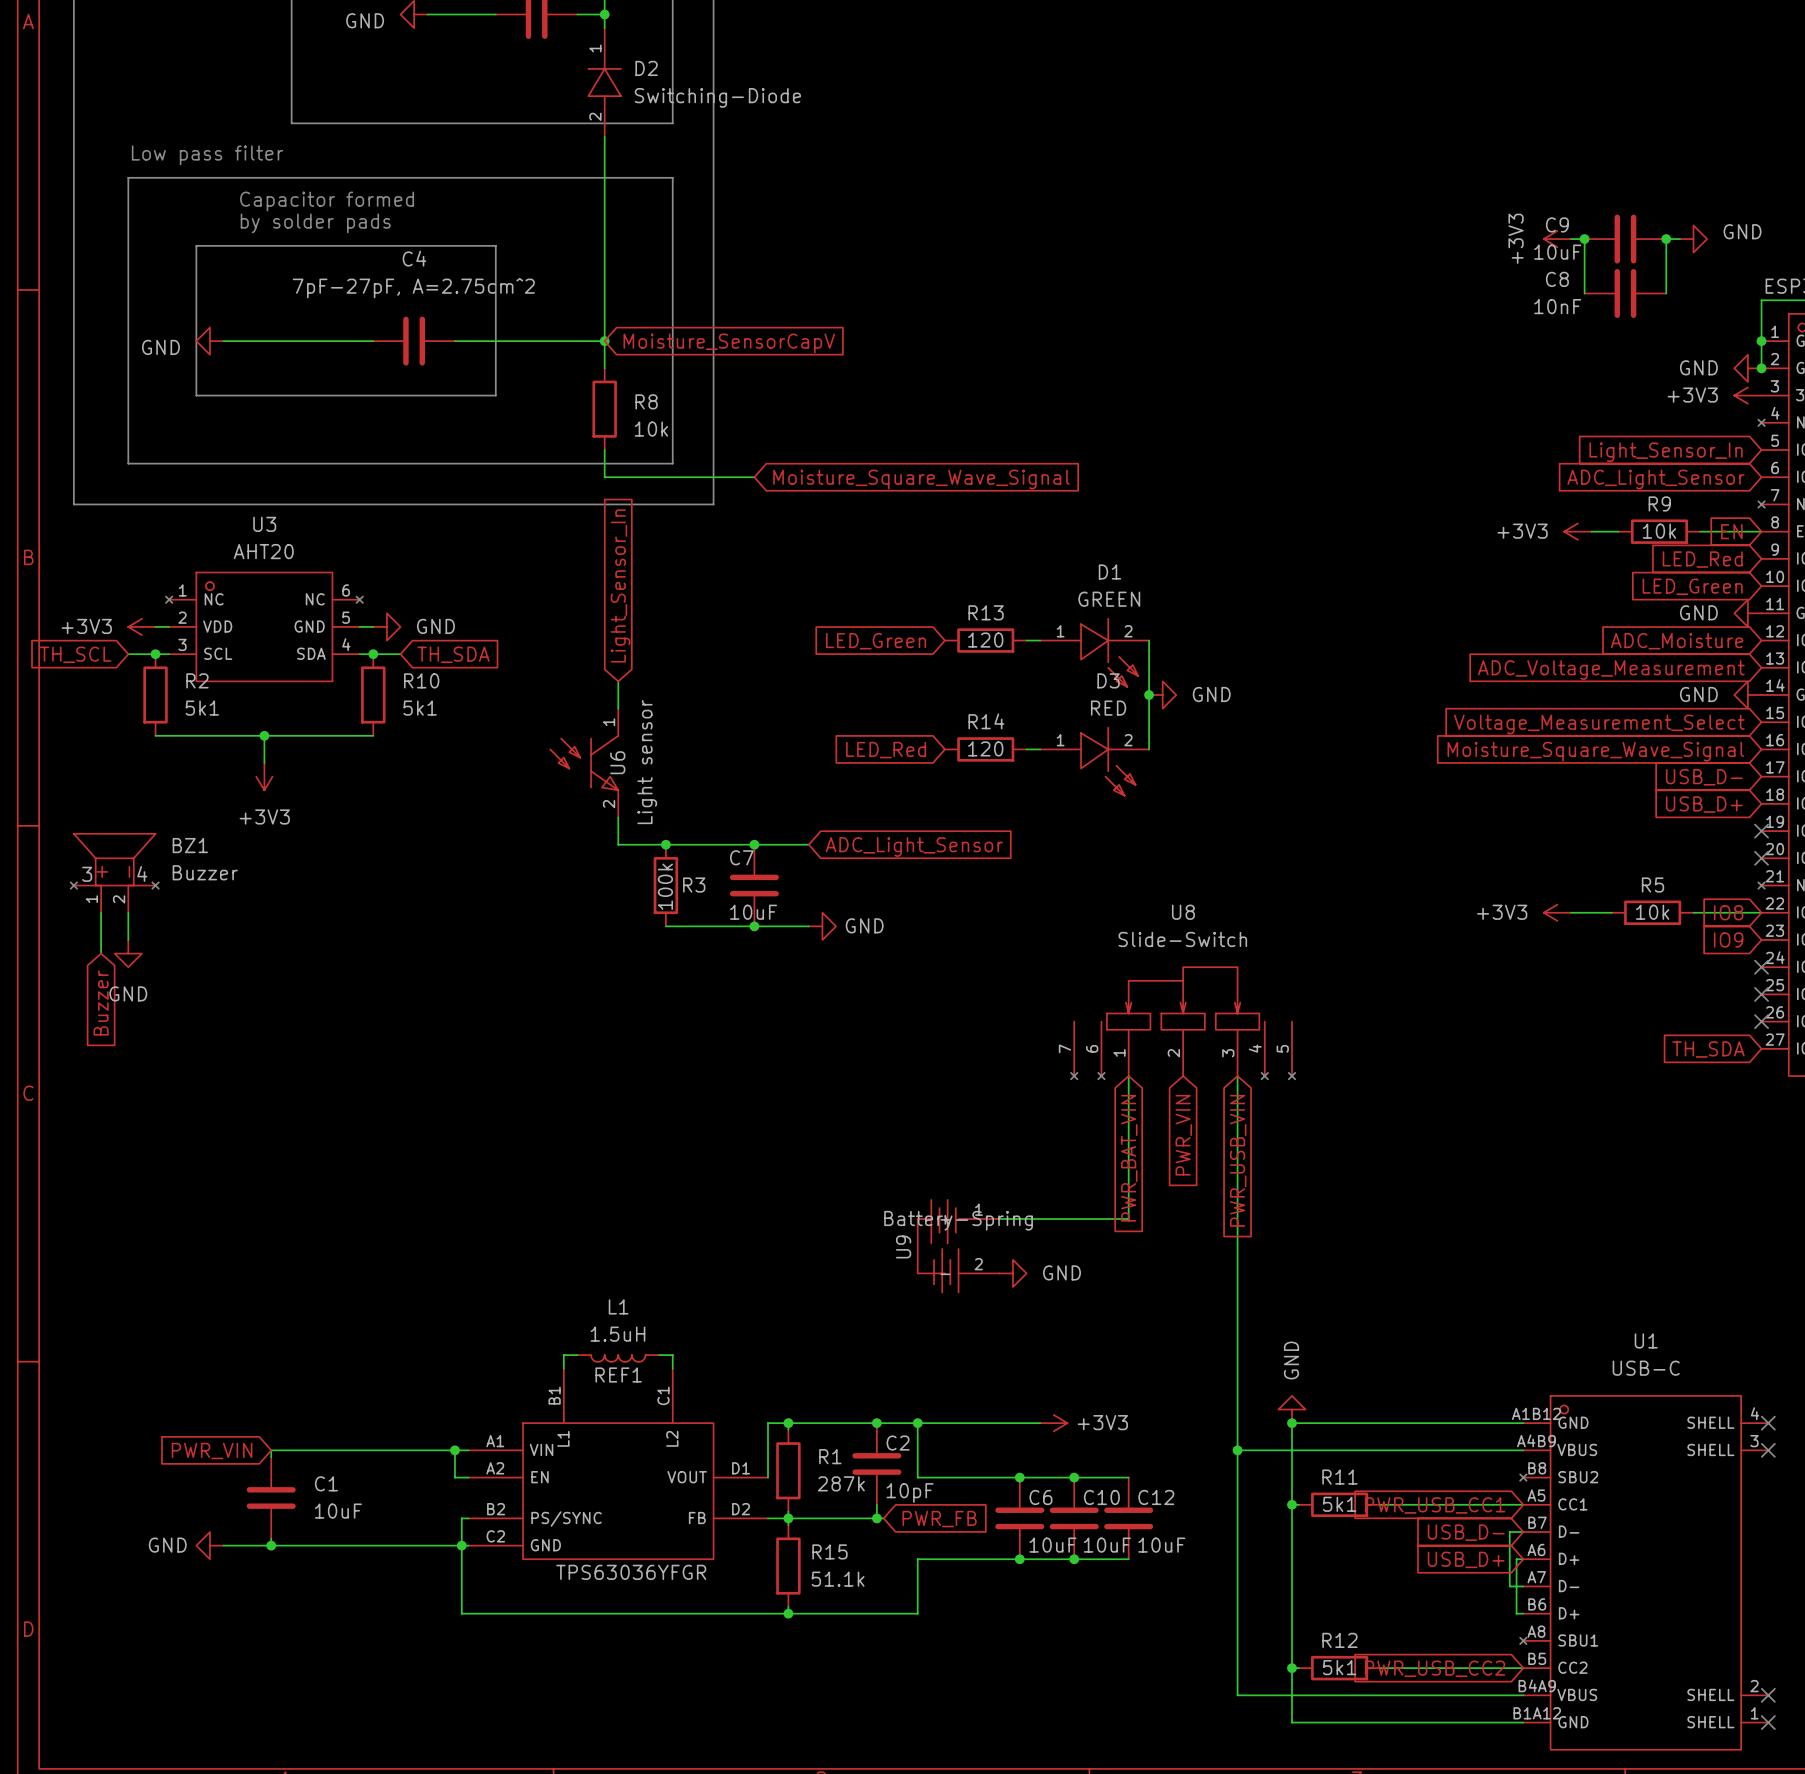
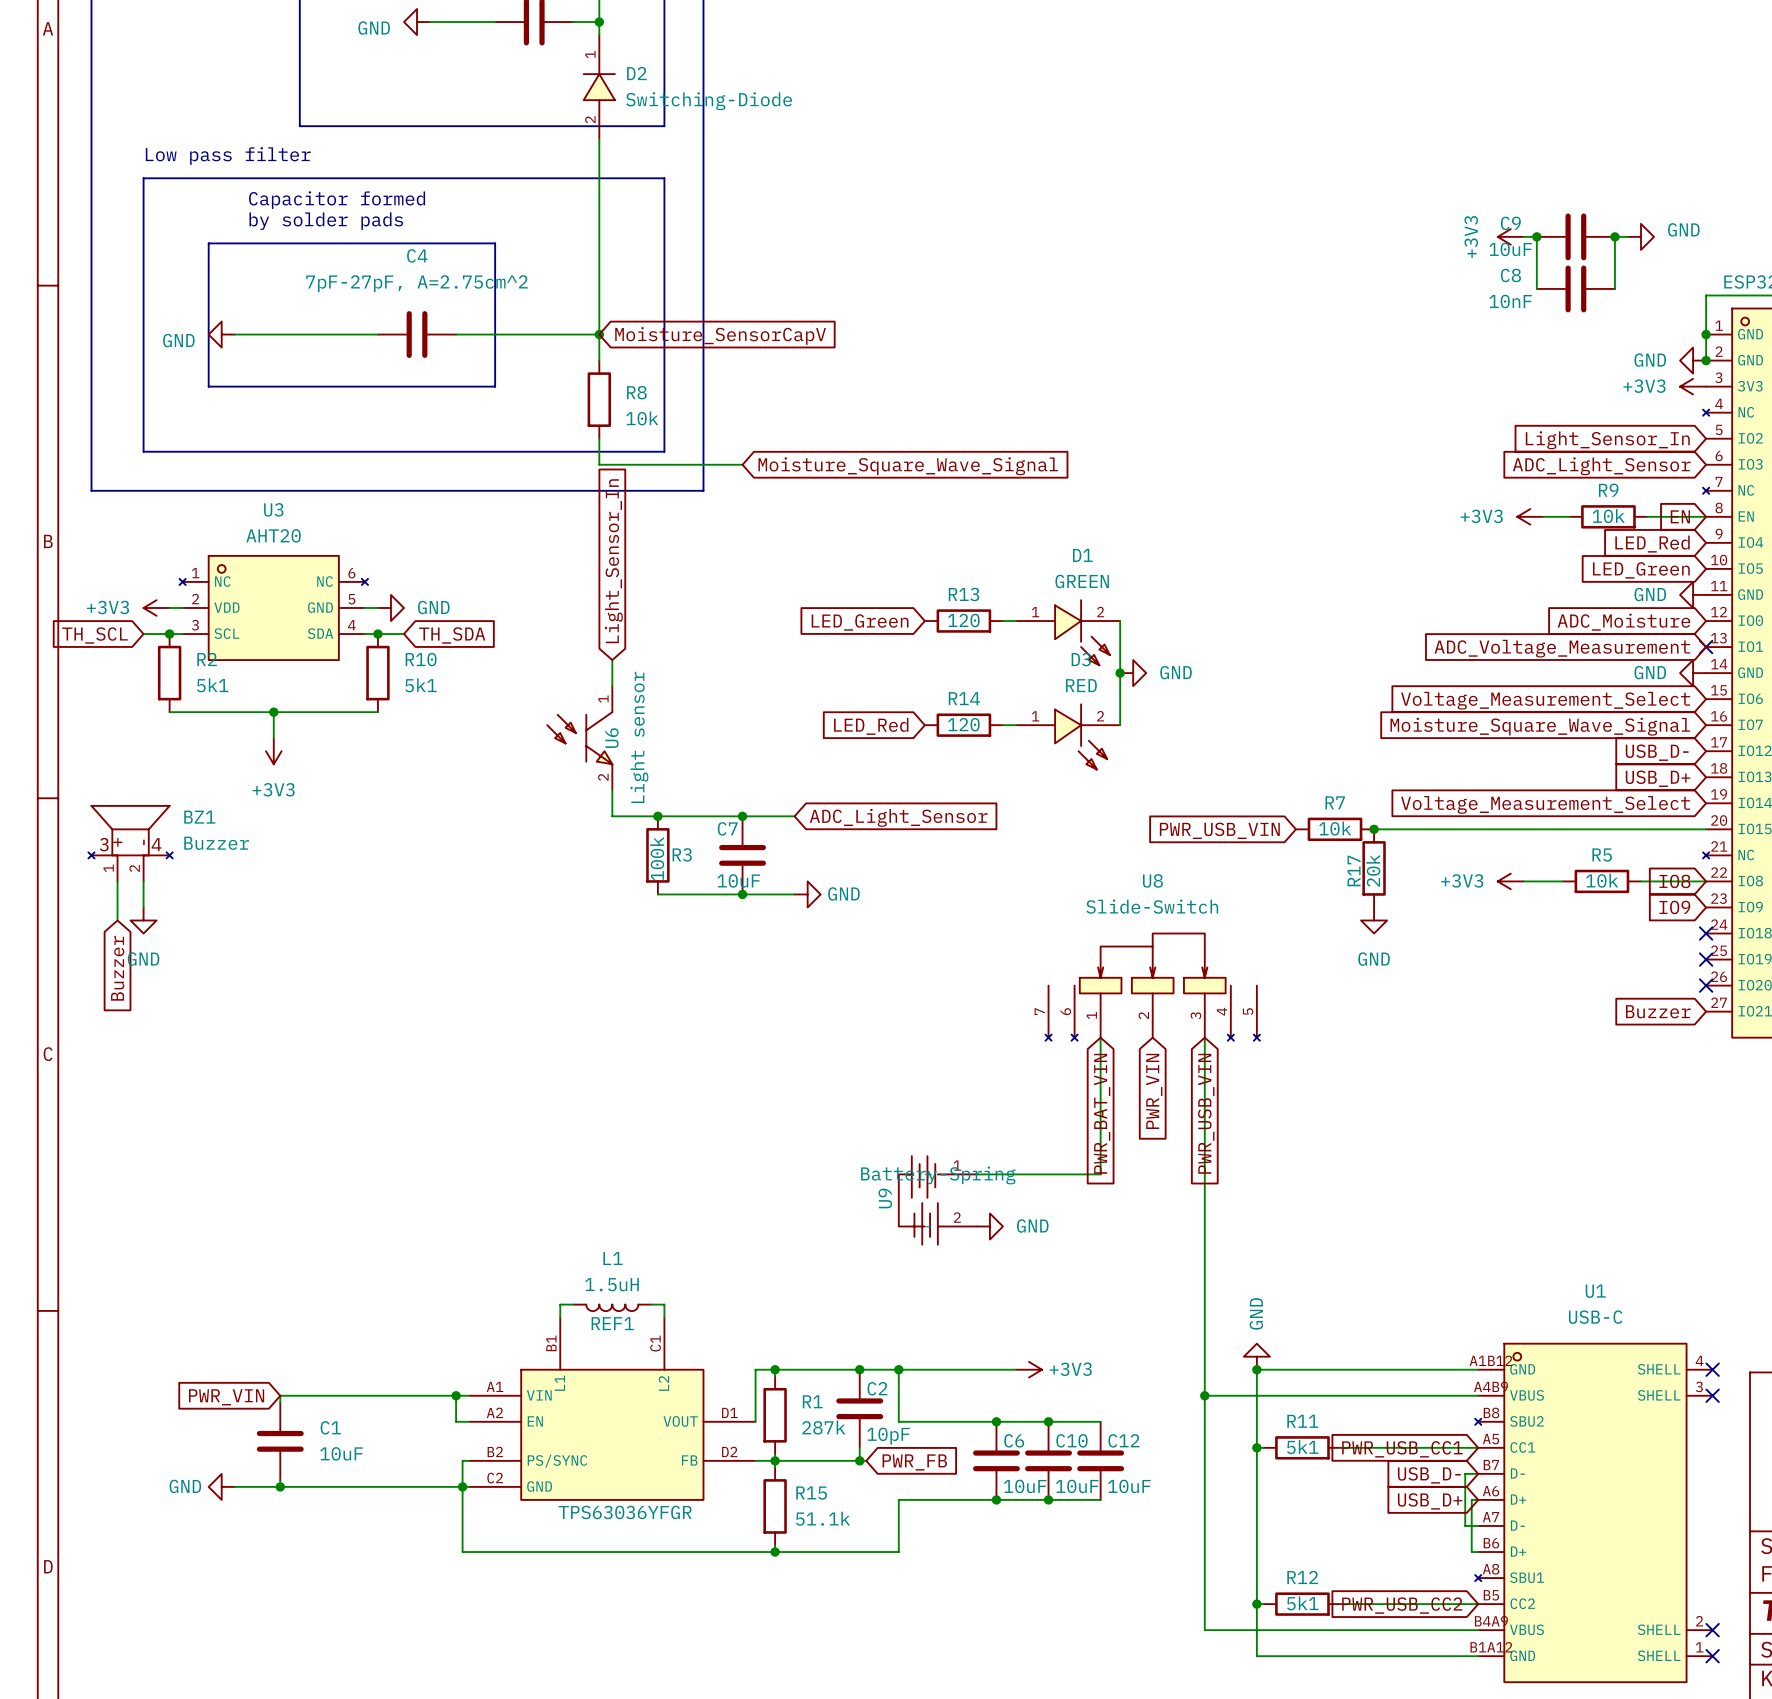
no-connect mark: none -> (1706, 647)
no-connect mark: (1761, 831) -> none
global label: none -> Voltage_Measurement_Select (1545, 804)
global label: none -> PWR_USB_VIN (1219, 830)
R7: none -> 10k (1335, 829)
wire: none -> (1374, 829) (1706, 829)
junction: none -> (1374, 829)
no-connect mark: (1761, 858) -> none
R17: none -> 20k (1374, 868)
power symbol: none -> GND (1374, 920)
global label: TH_SDA (1708, 1049) -> Buzzer (1658, 1011)

